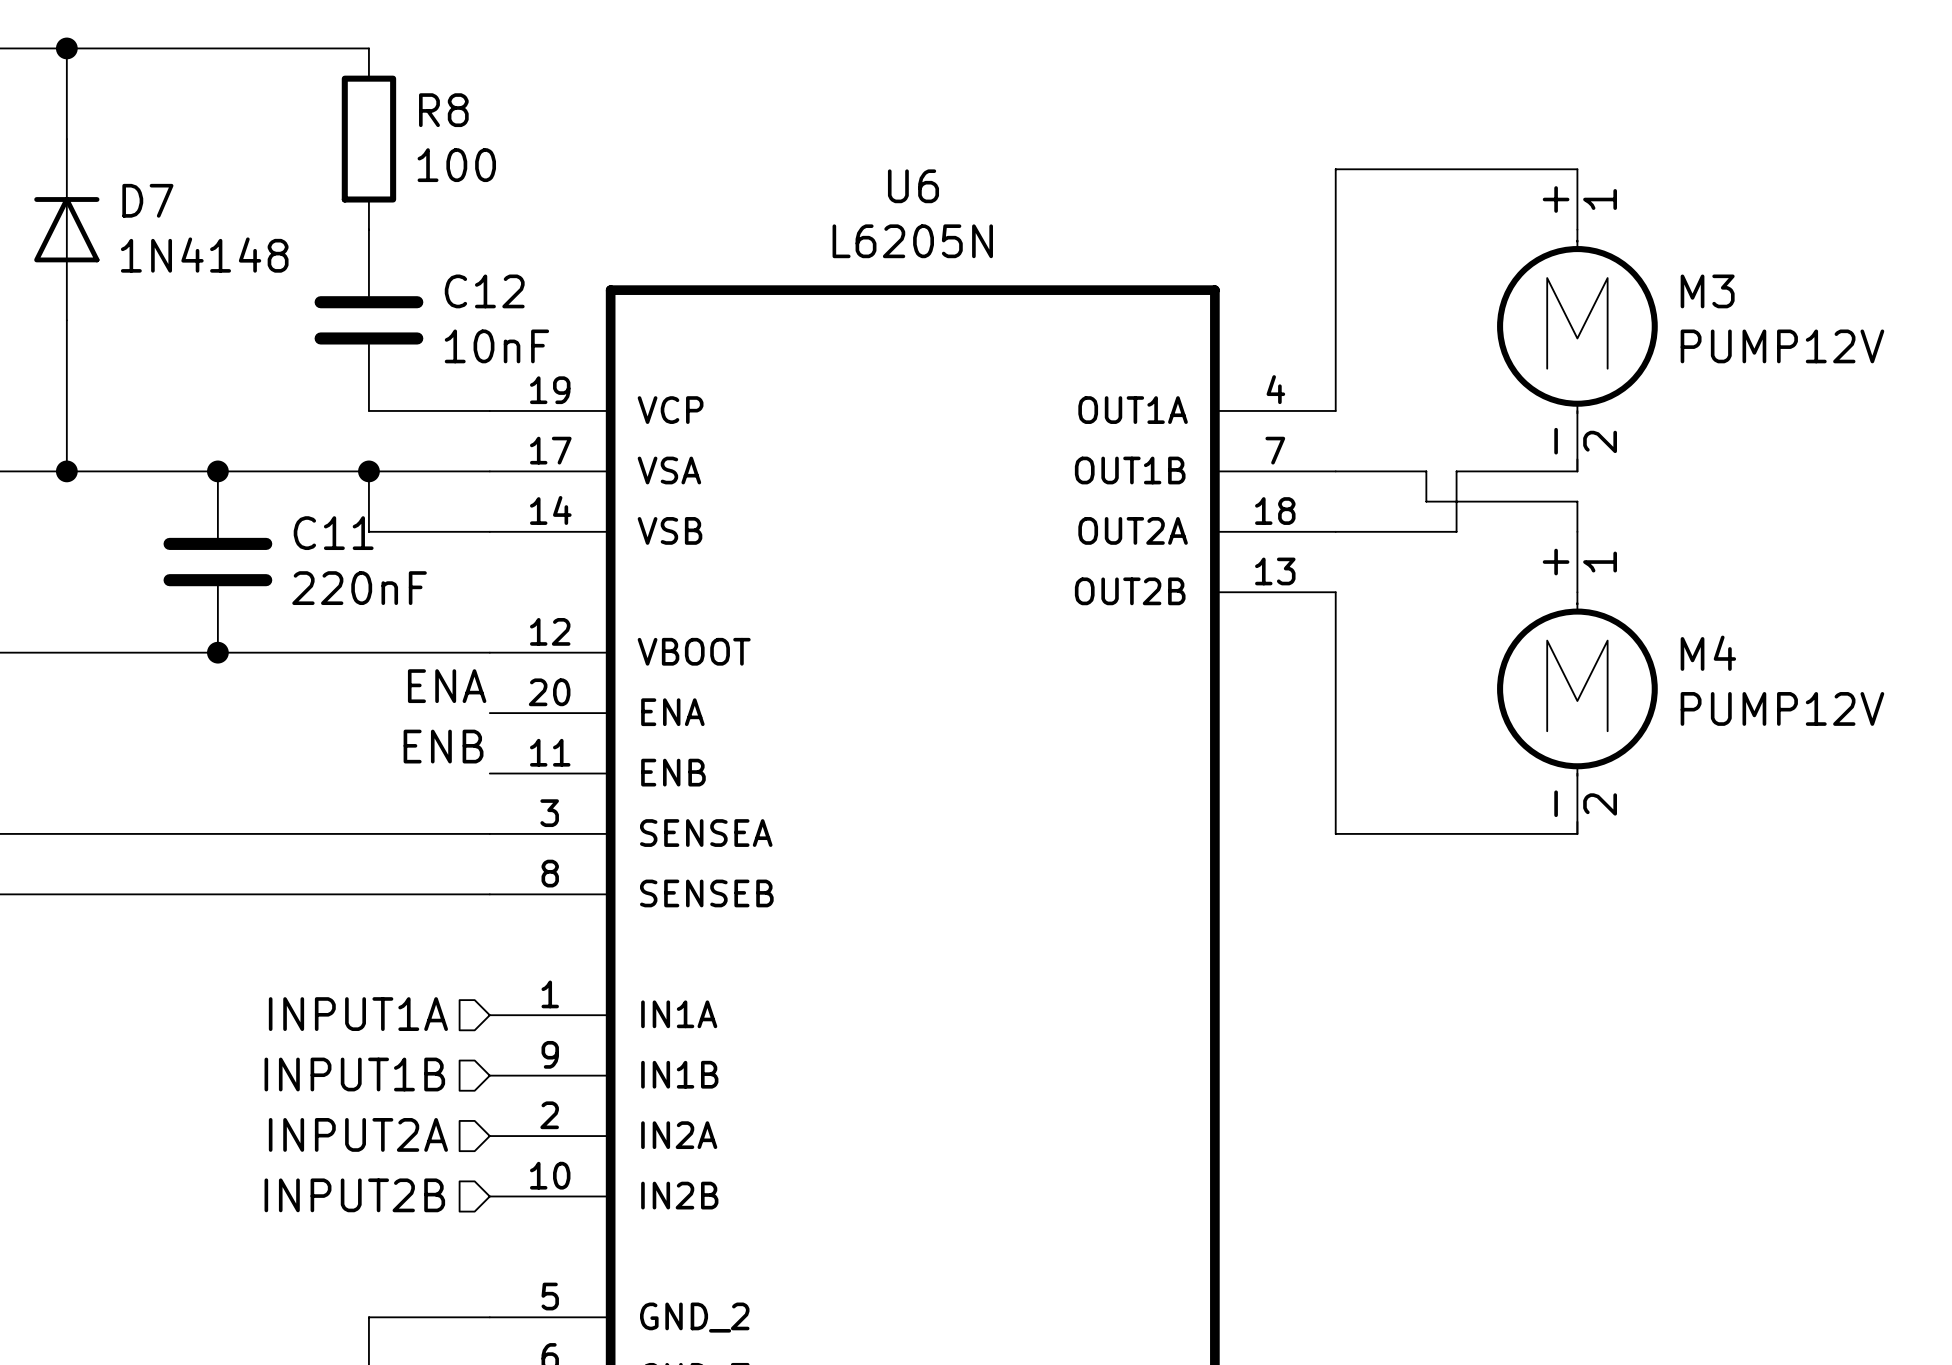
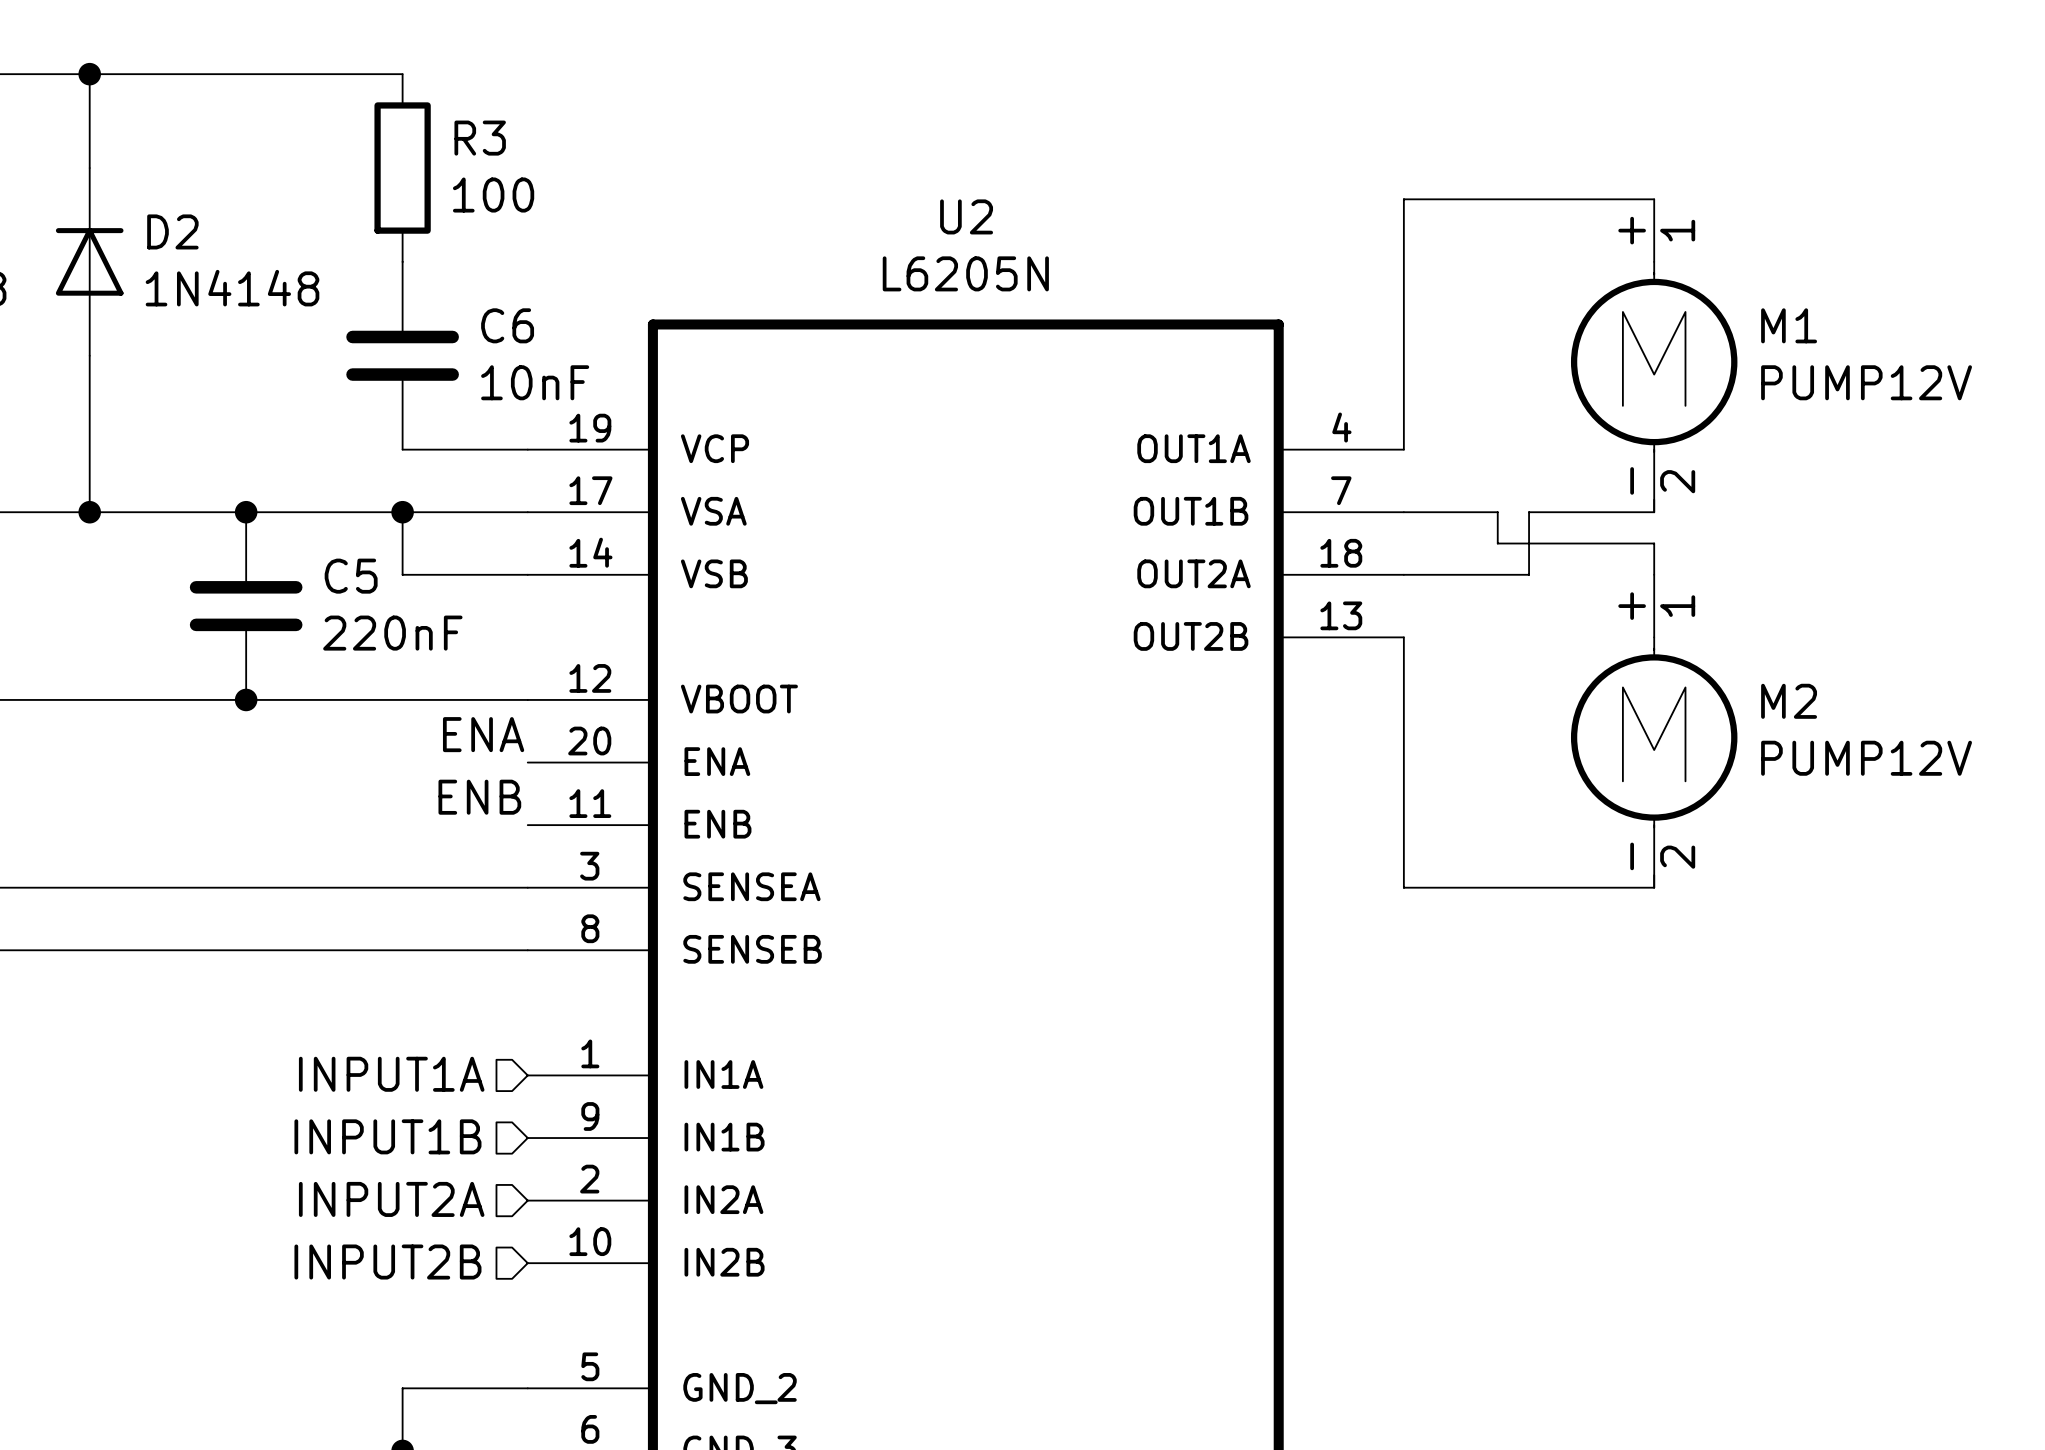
R8 name: R8 (443, 110) -> R3 (480, 138)
U6 name: U6 (913, 186) -> U2 (966, 216)
D7 name: D7 (147, 200) -> D2 (172, 231)
C12 name: C12 (484, 291) -> C6 (507, 325)
M3 name: M3 (1707, 291) -> M1 (1789, 325)
C11 name: C11 (333, 533) -> C5 (351, 576)
M4 name: M4 (1708, 653) -> M2 (1789, 701)

